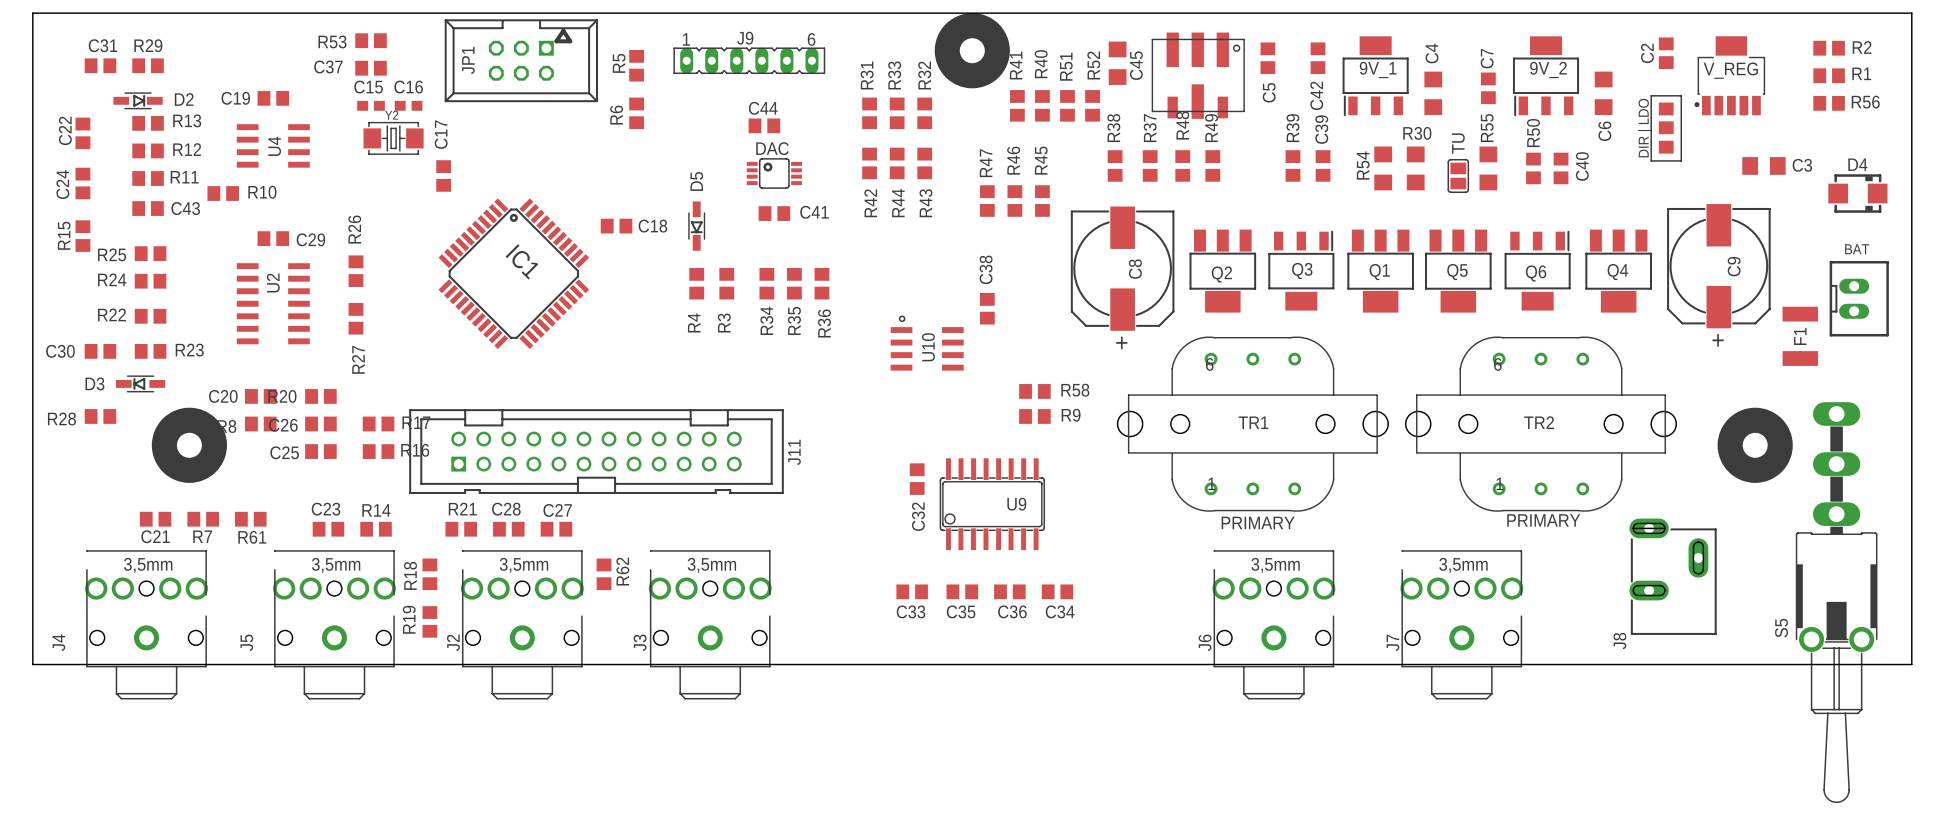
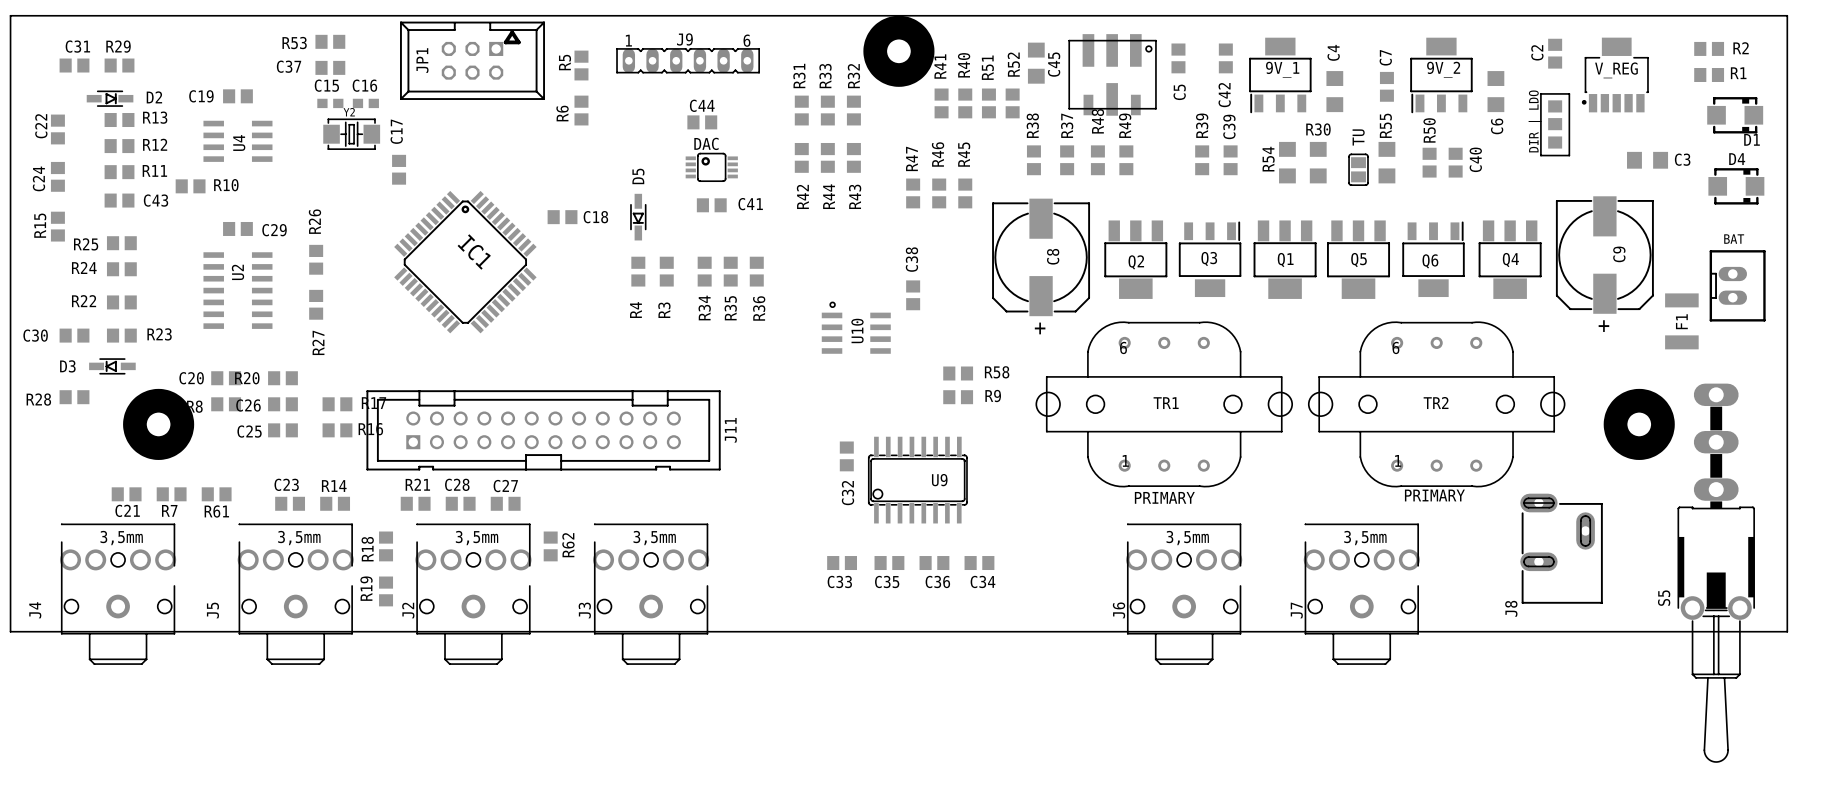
R56: (1829, 103) -> none
D1: none -> (1735, 115)

